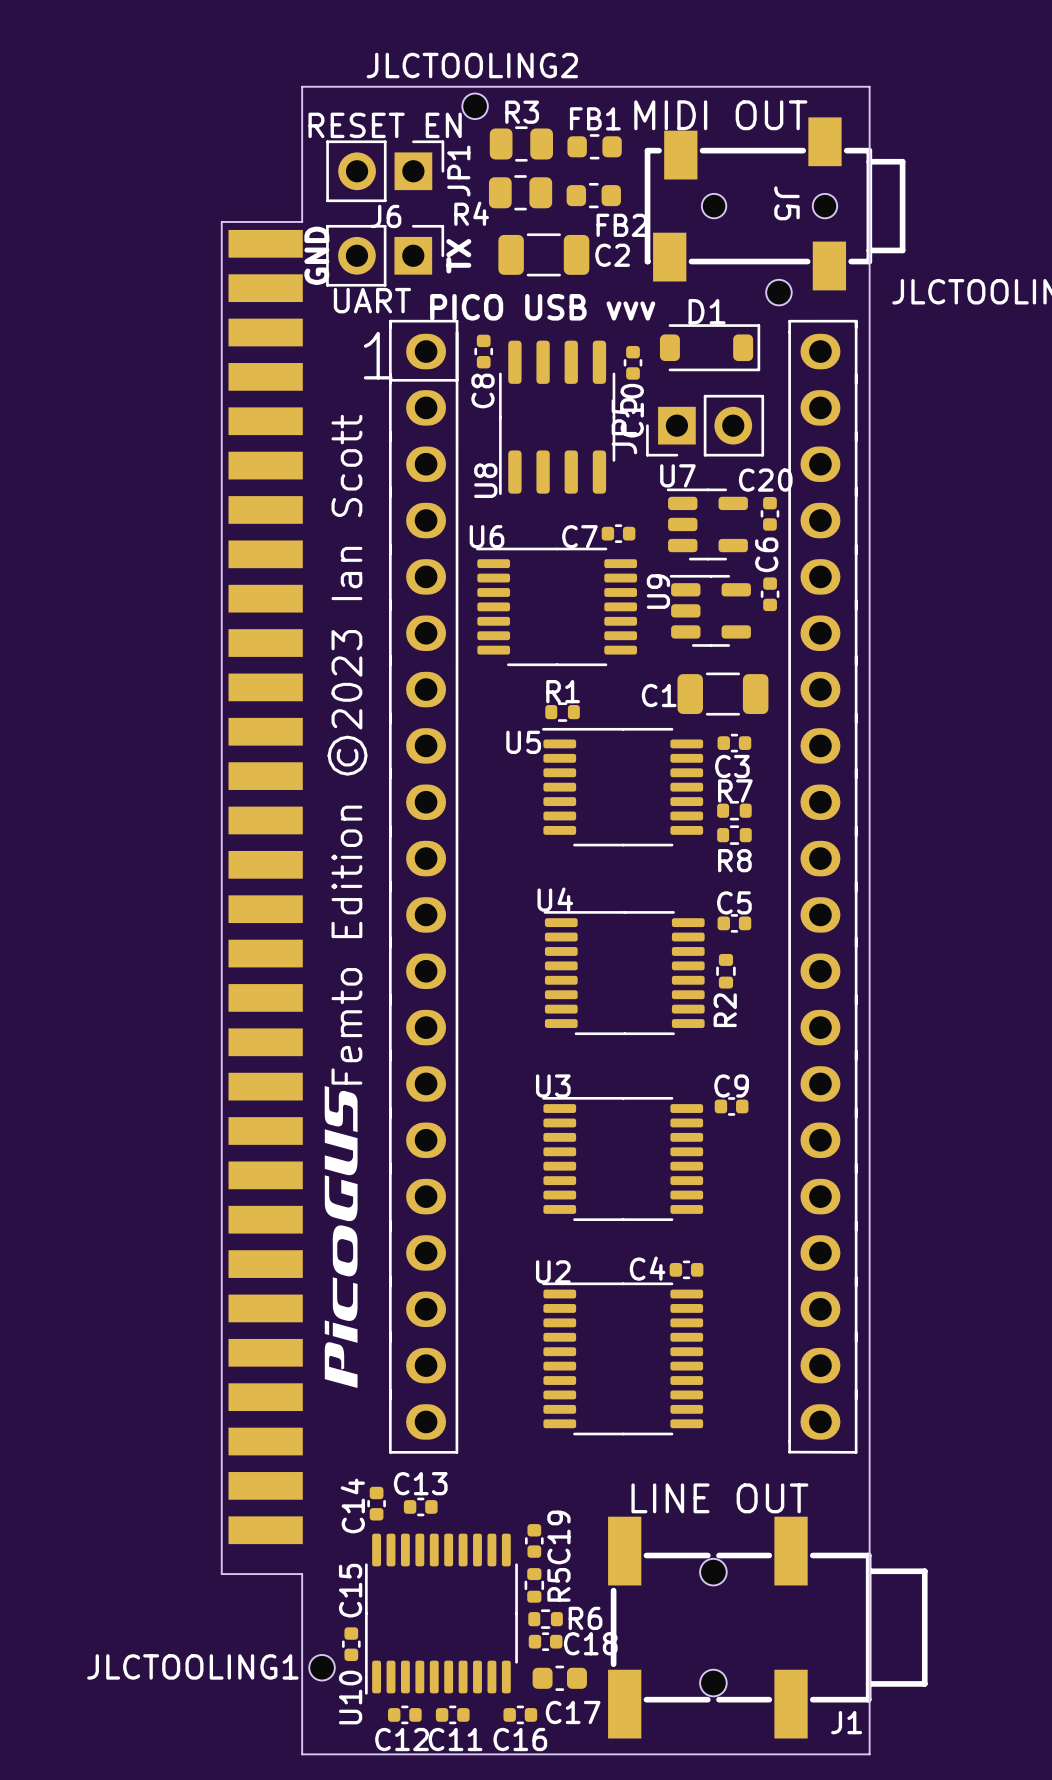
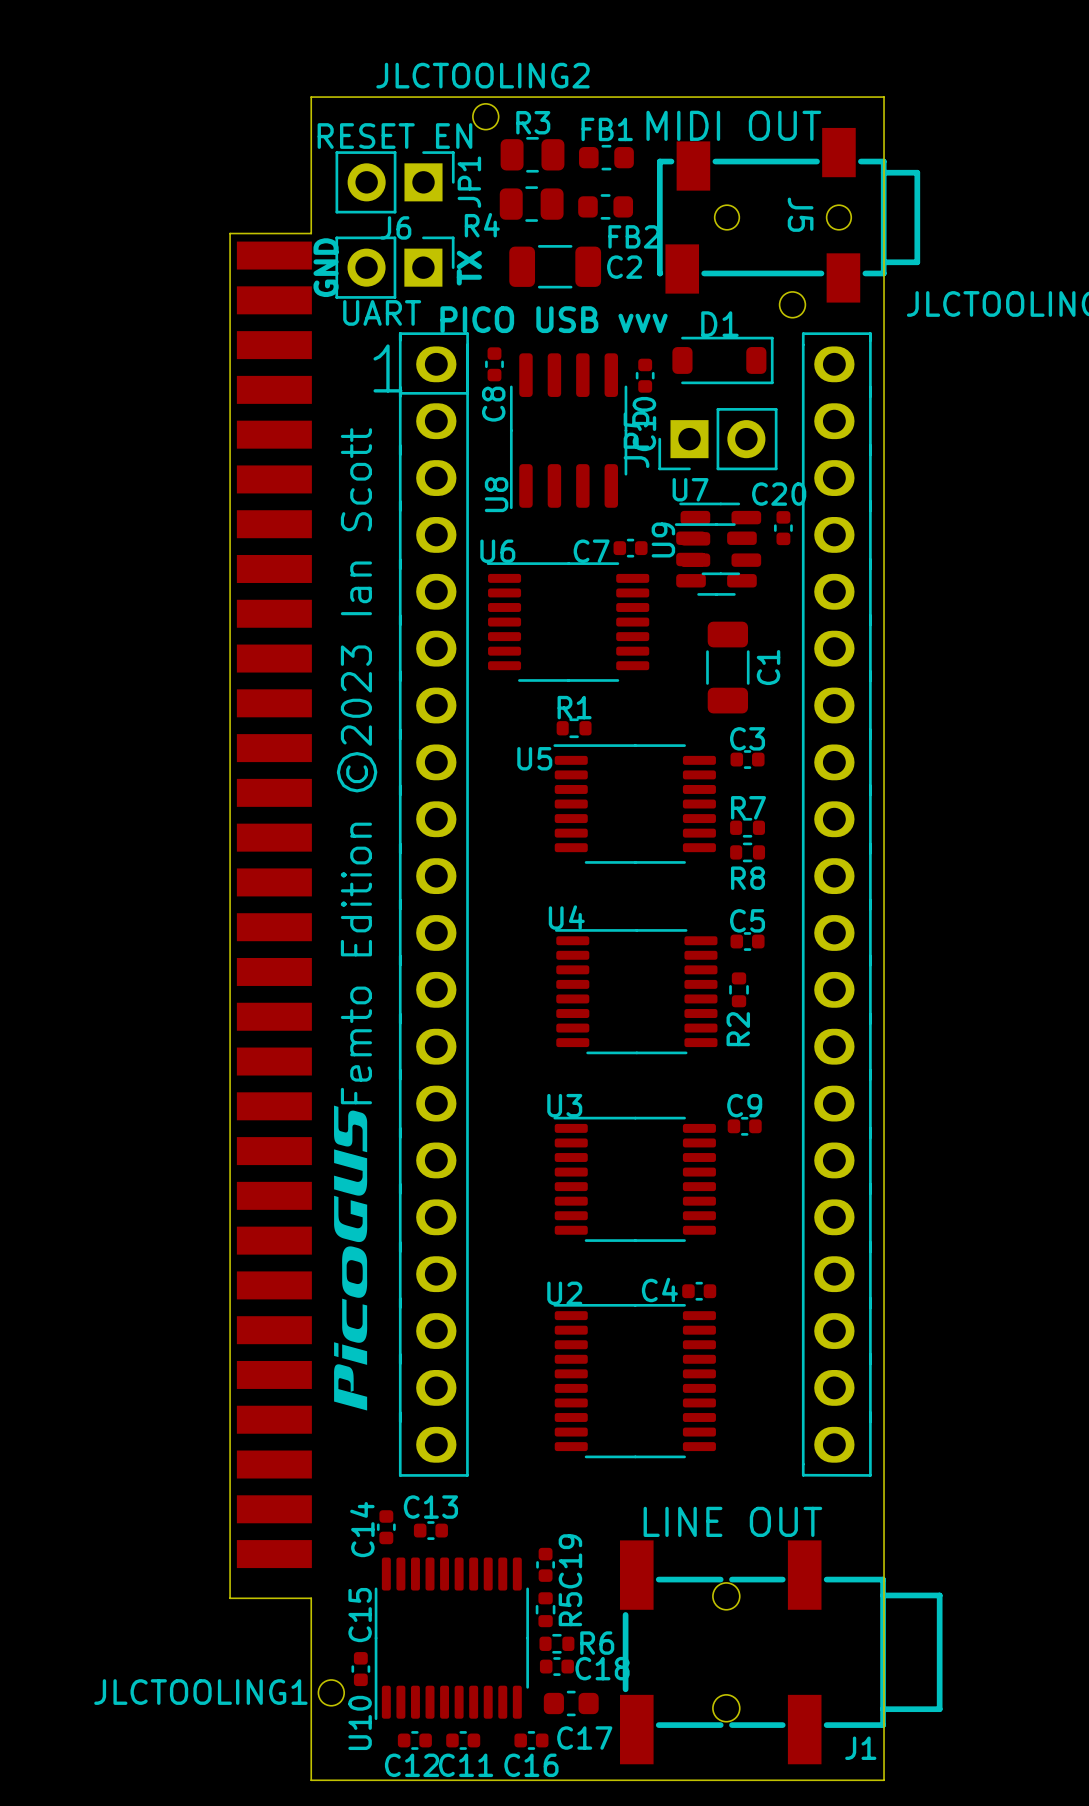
C6: (770, 594) -> none
U9 position: (710, 610) -> (715, 559)
C1 rotation: 0° (722, 694) -> 90° clockwise (727, 667)
C1 name position: C1 (659, 695) -> C1 (768, 667)
C3 name position: C3 (732, 766) -> C3 (747, 738)

